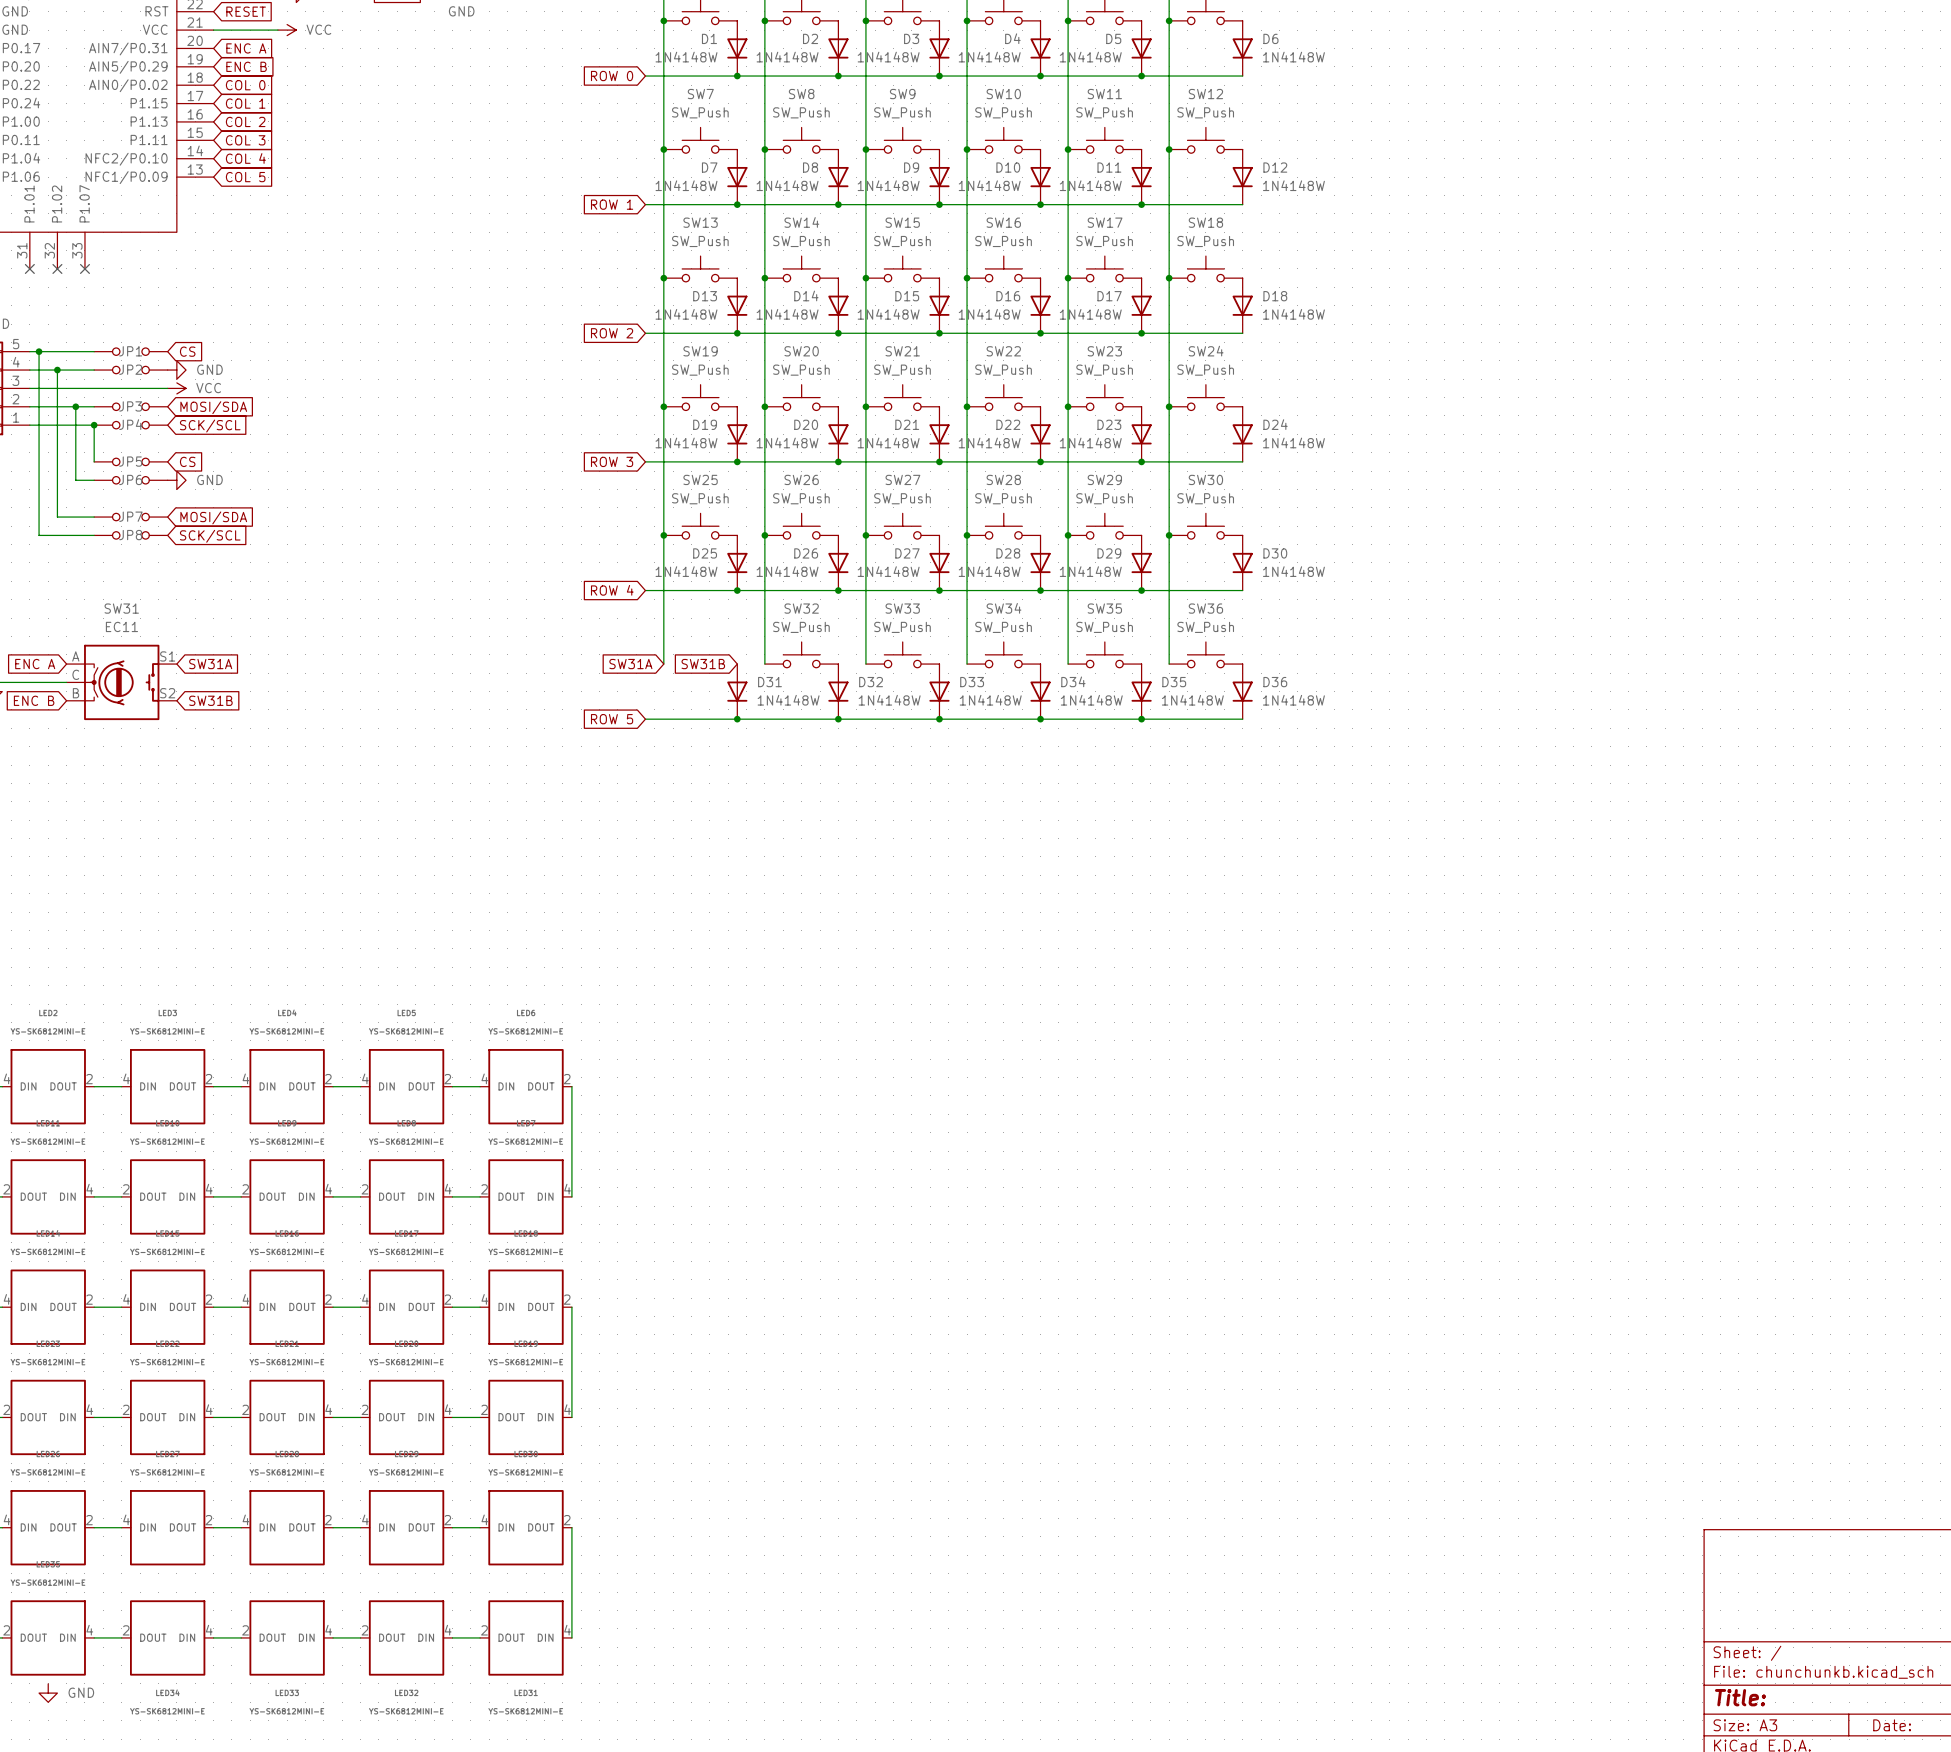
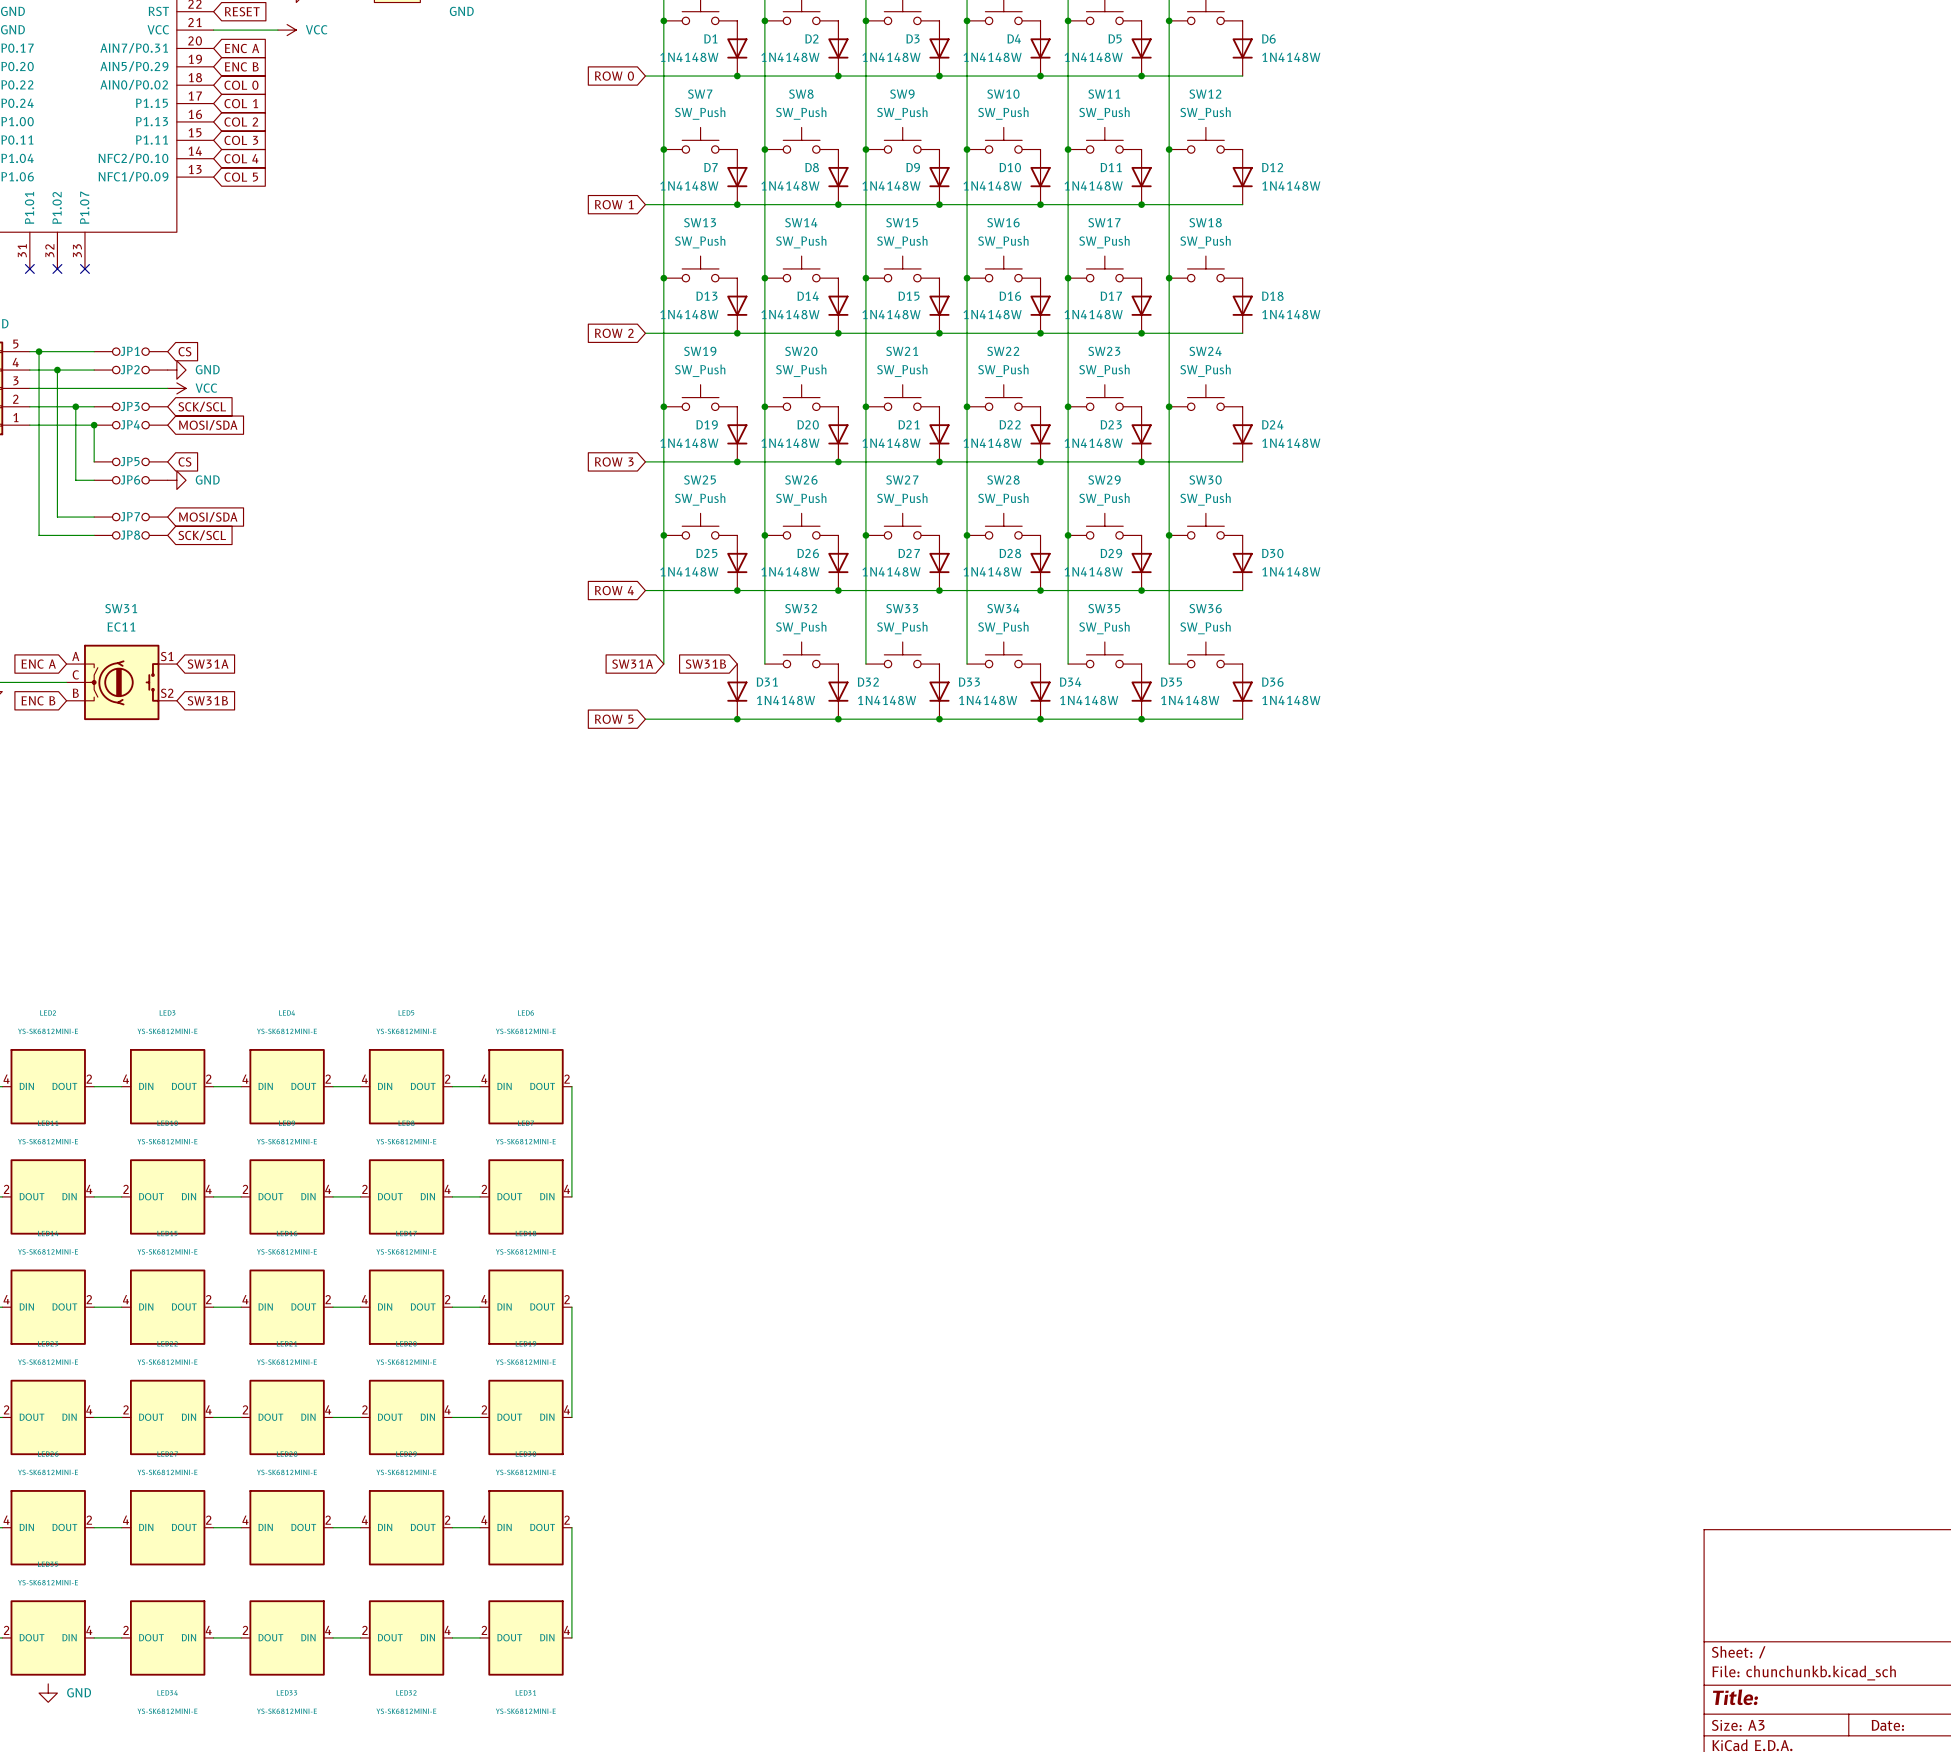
global label: MOSI/SDA (213, 407) -> SCK/SCL (202, 406)
global label: SCK/SCL (210, 426) -> MOSI/SDA (208, 425)

